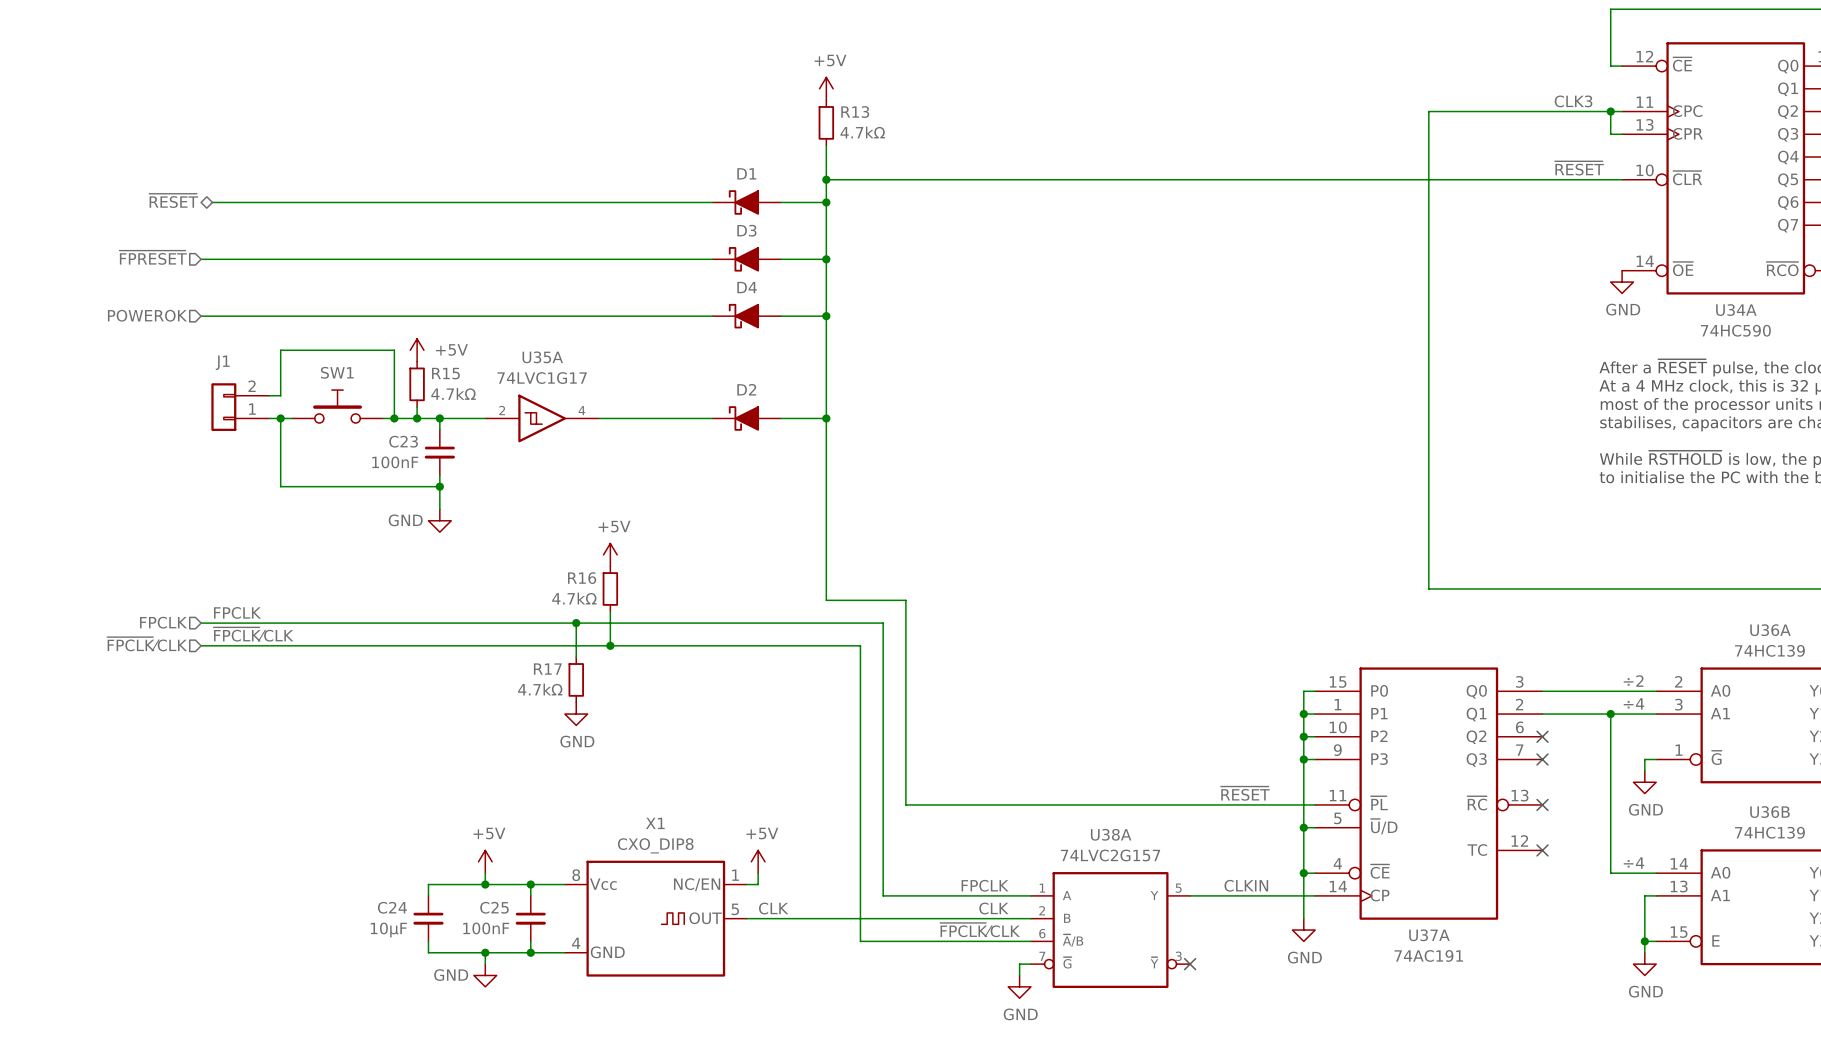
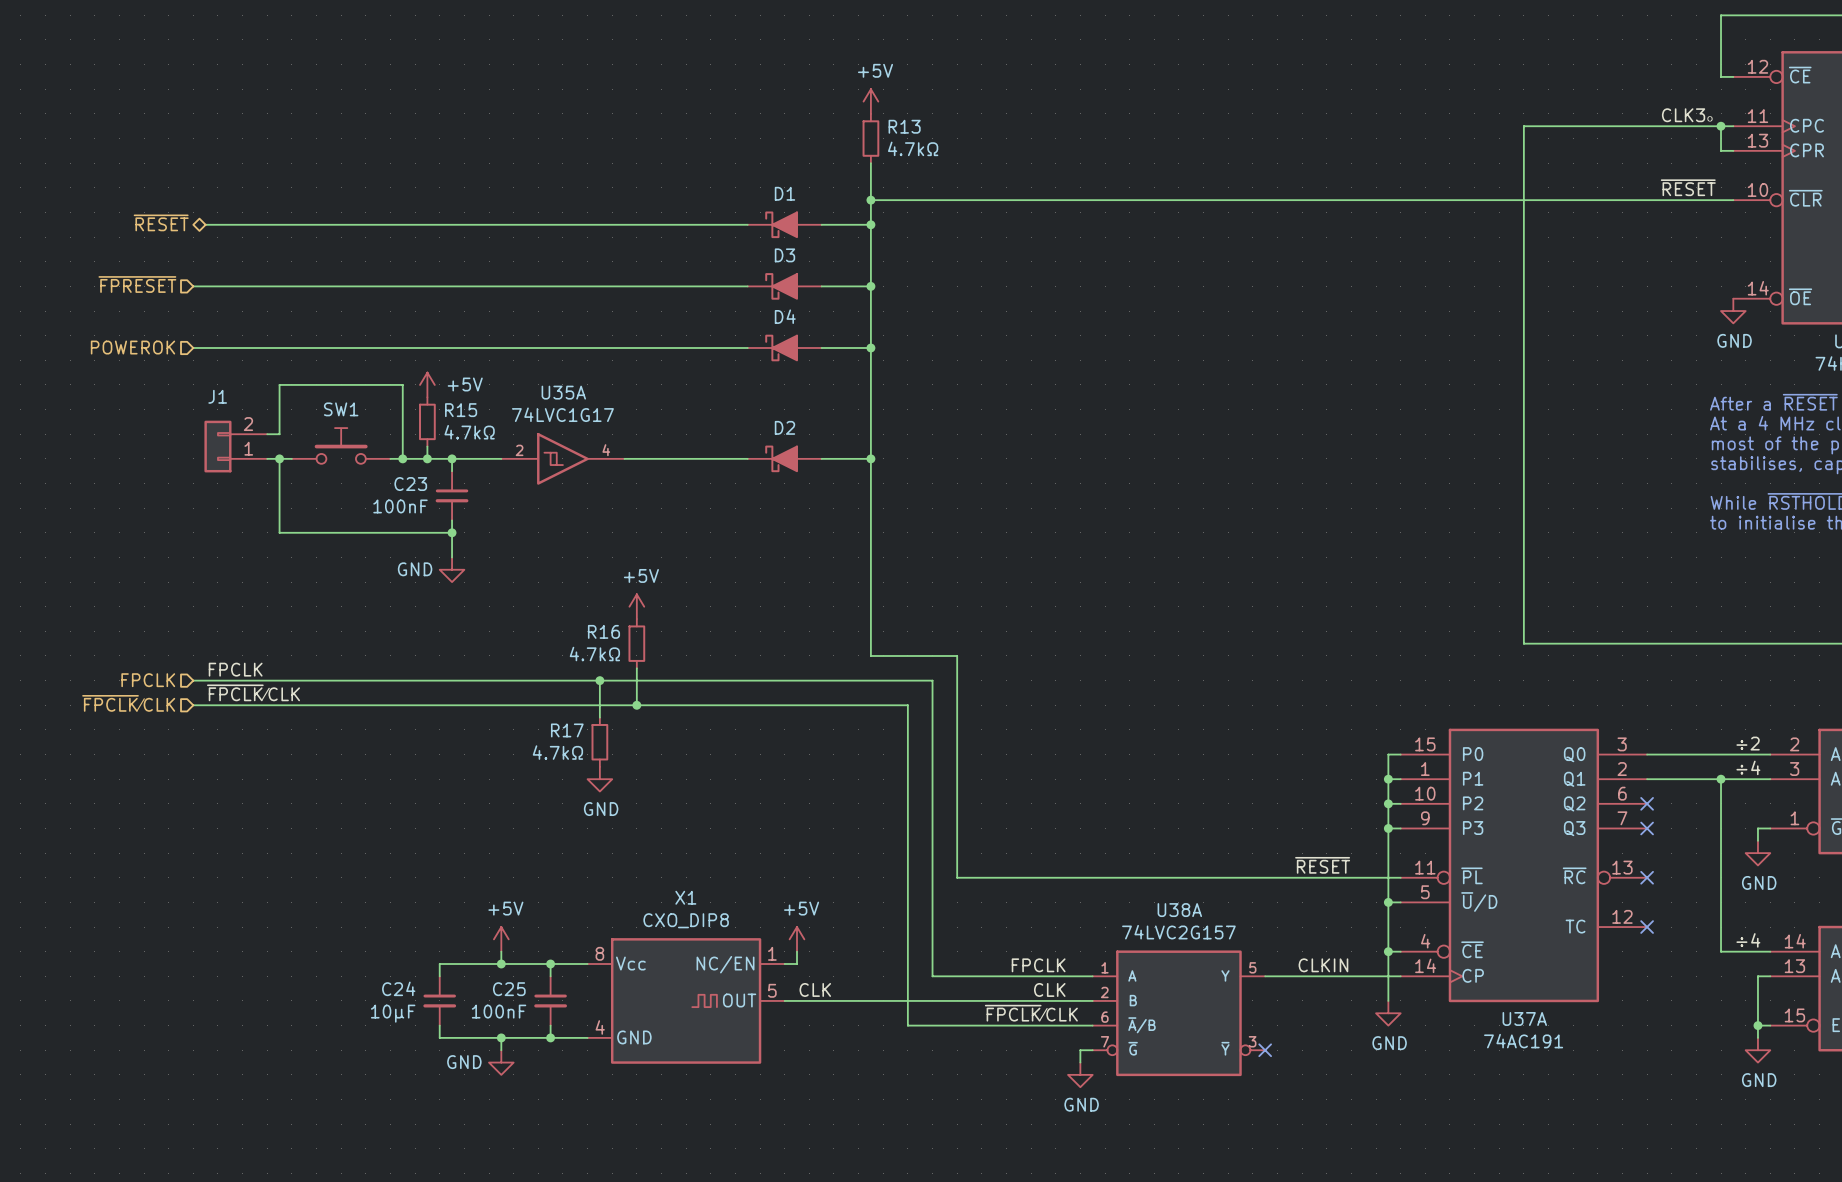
label: CLK3 (1573, 101) -> CLK3ₒ (1687, 115)

